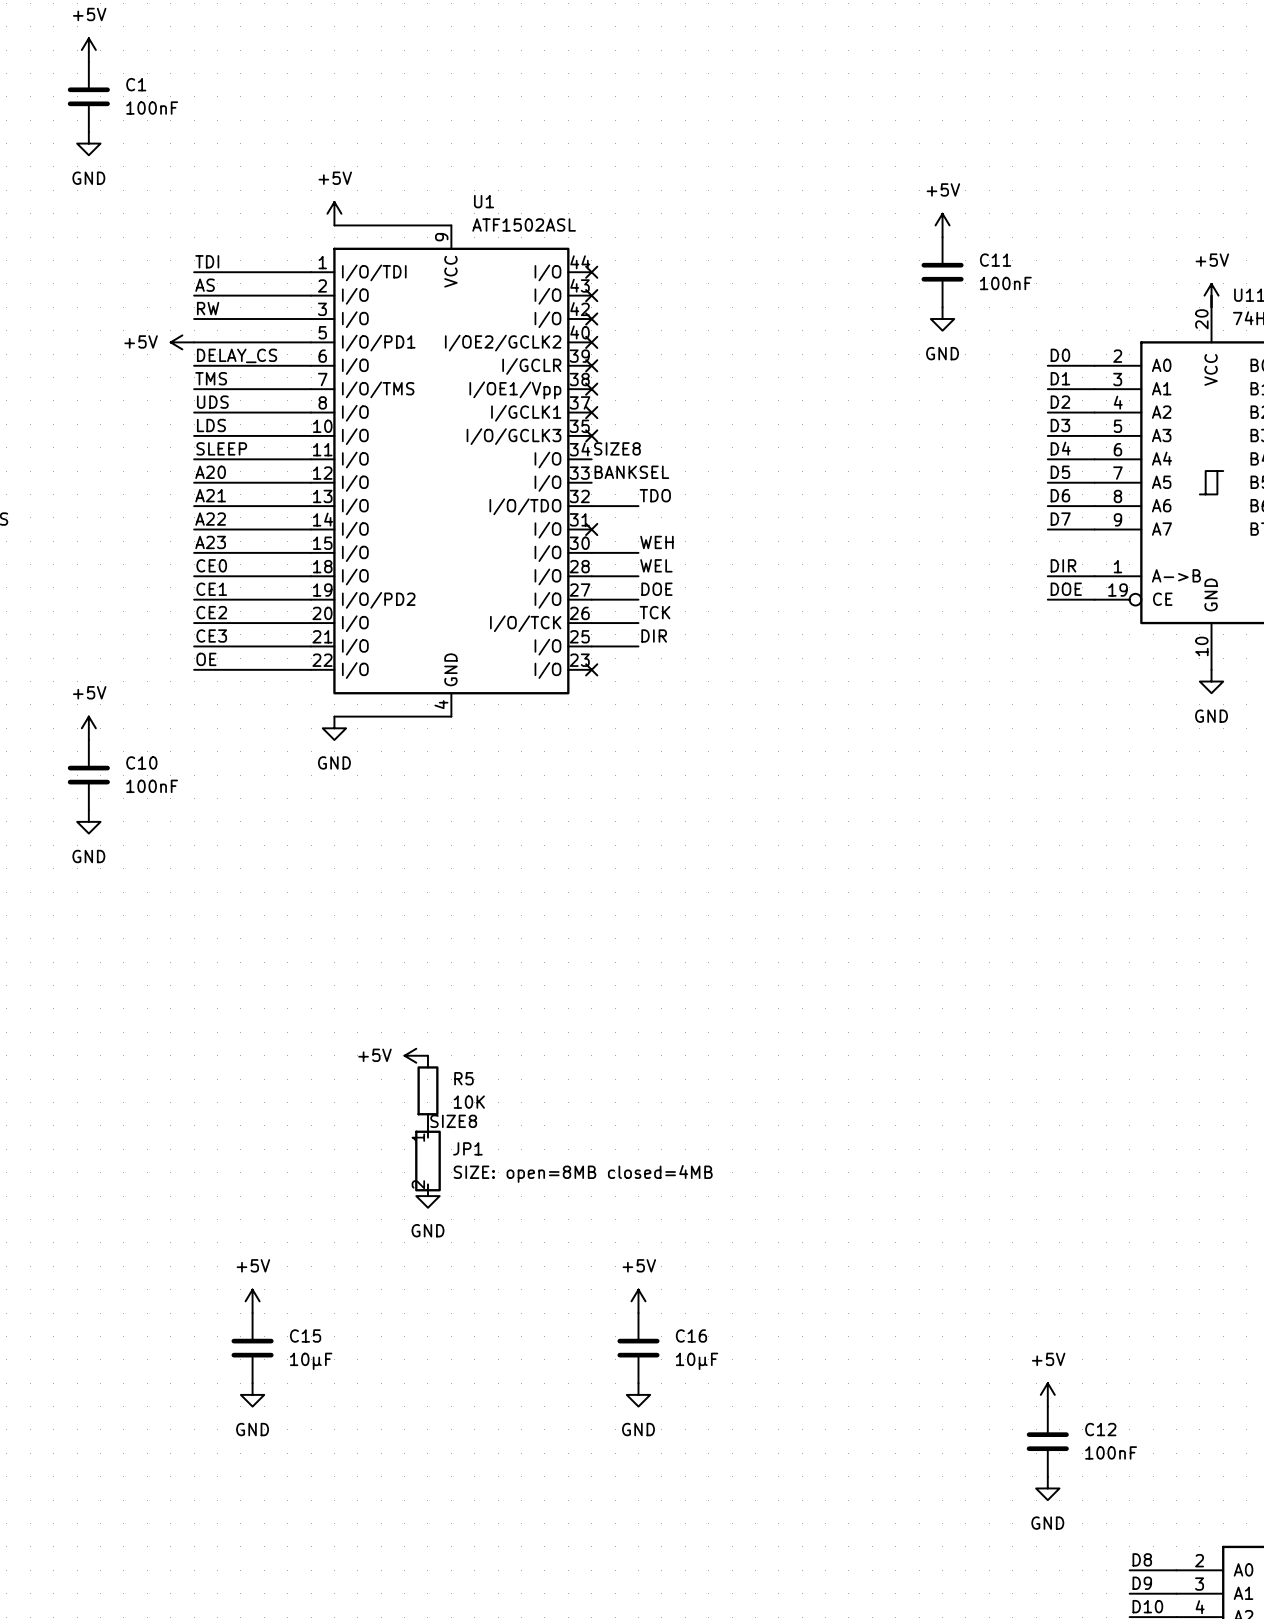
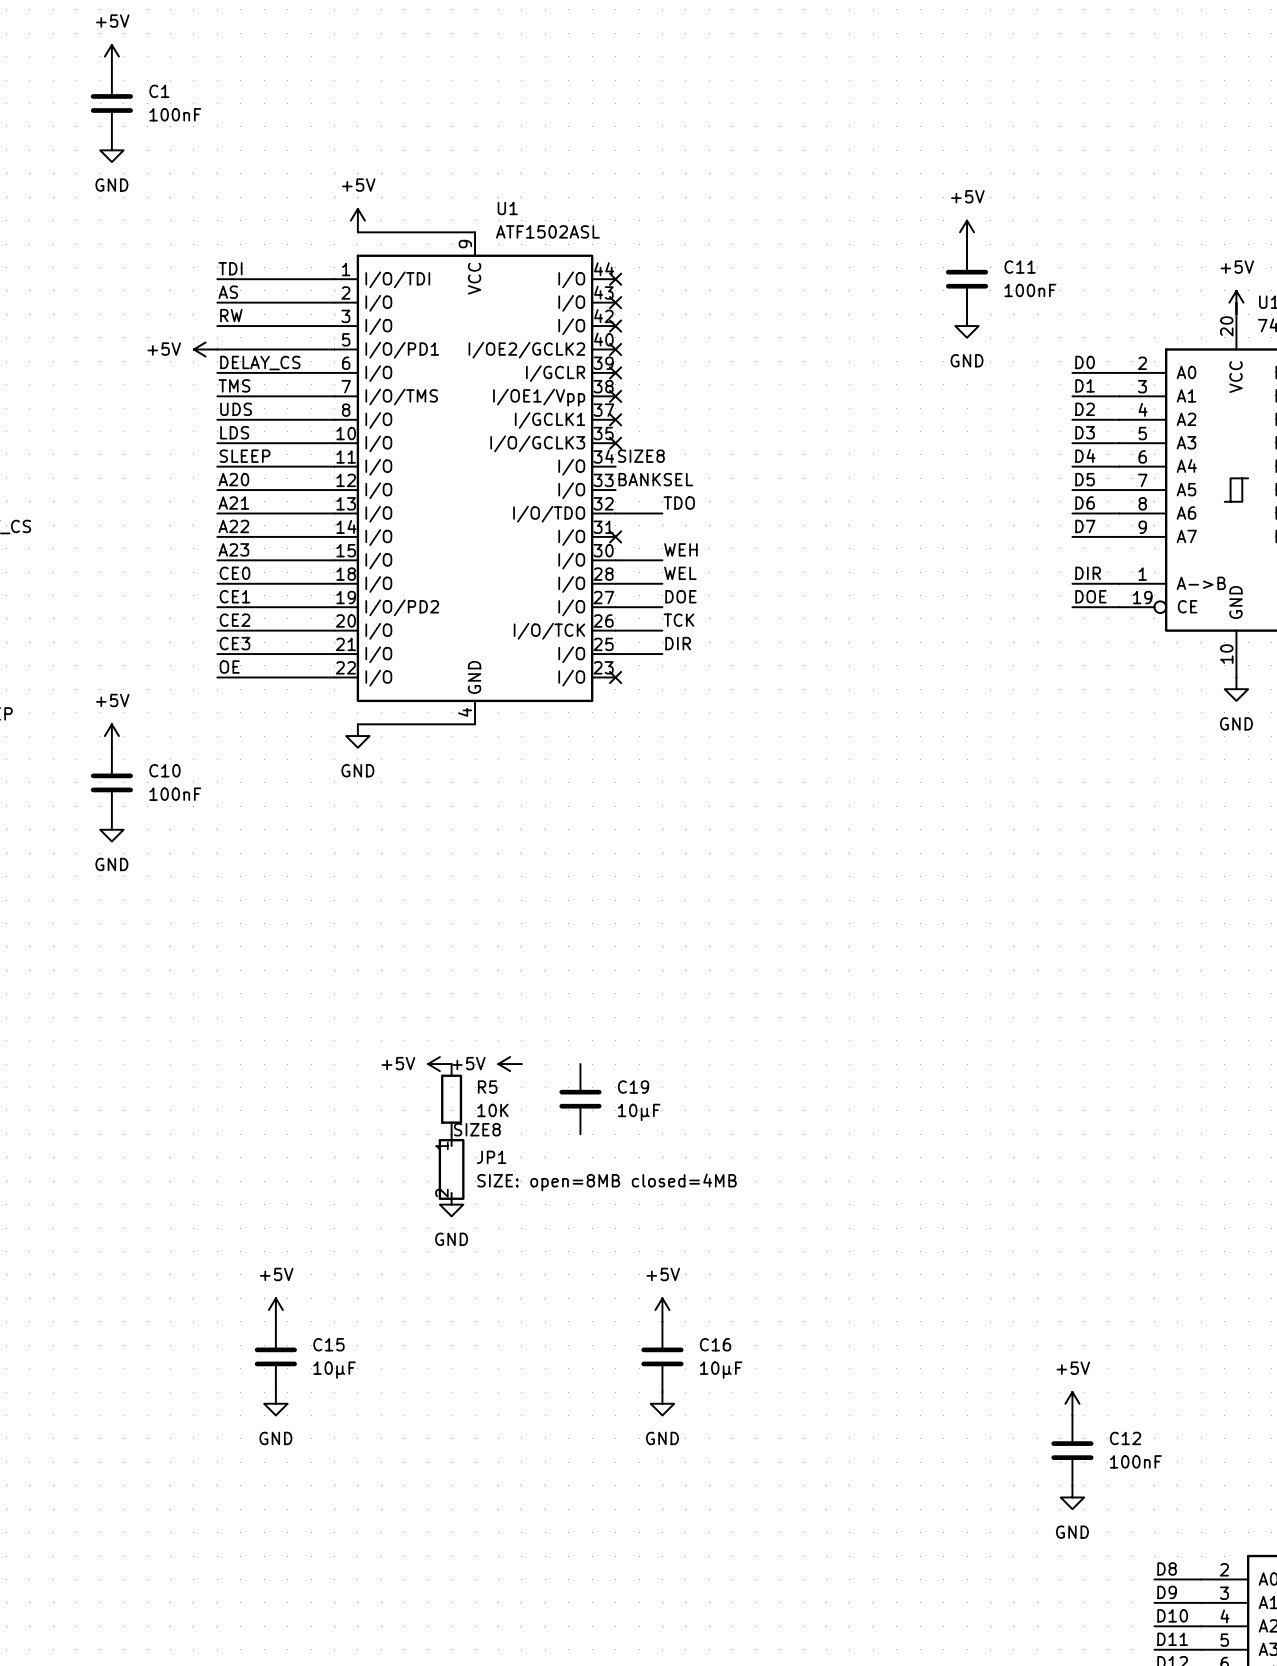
power symbol: none -> +5V (510, 1064)
C19: none -> 10µF (580, 1099)

